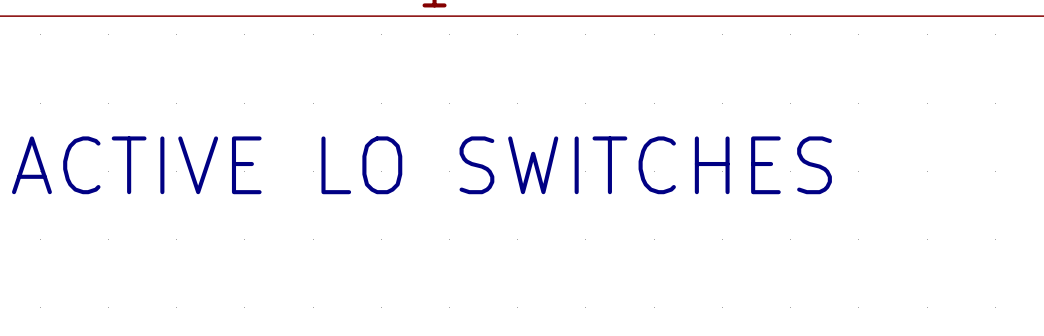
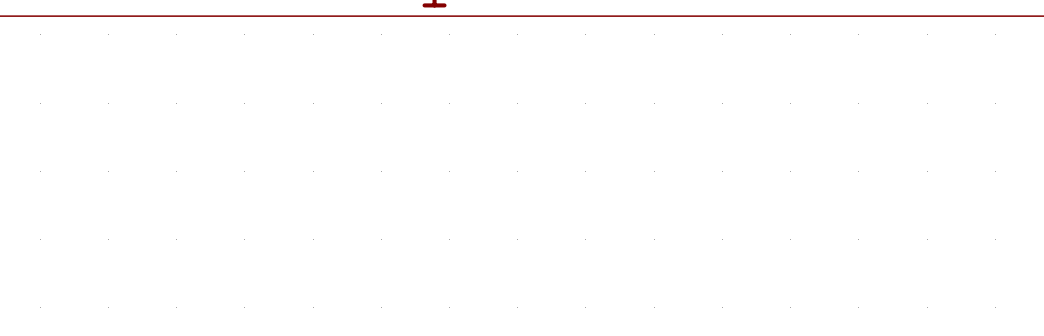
text: ACTIVE LO SWITCHES (421, 165) -> none

